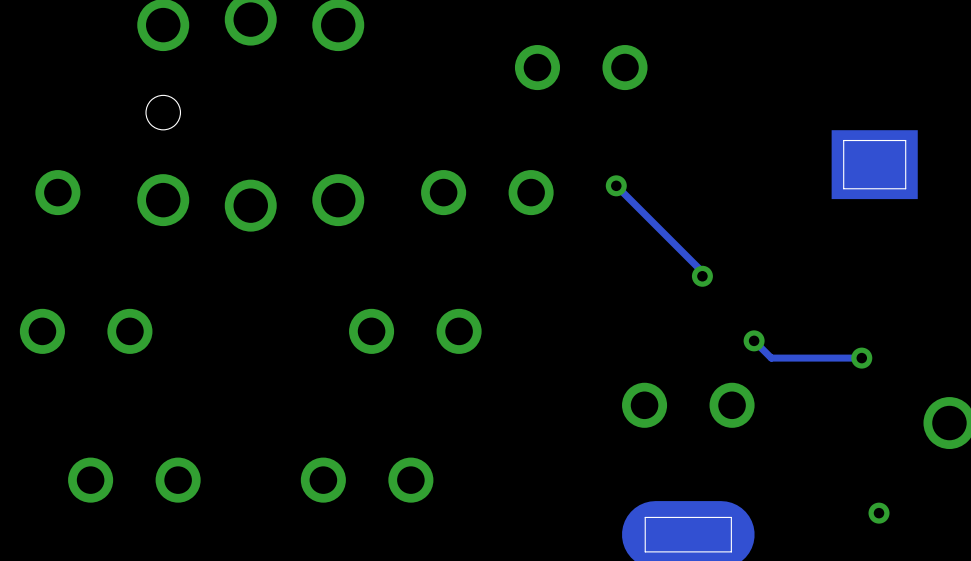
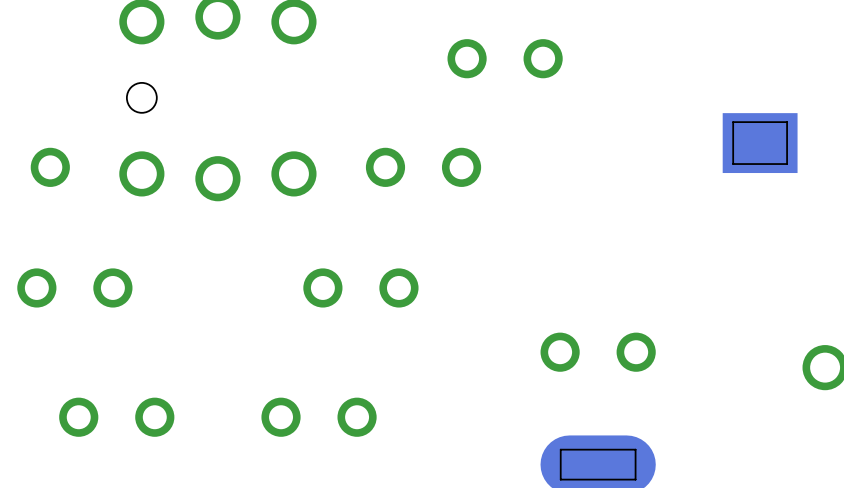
track: (616, 185) (702, 271) (702, 276) -> none
via: (616, 185) -> none
via: (702, 276) -> none
track: (754, 340) (771, 358) (861, 358) -> none
via: (754, 340) -> none
via: (861, 358) -> none
via: (879, 513) -> none

